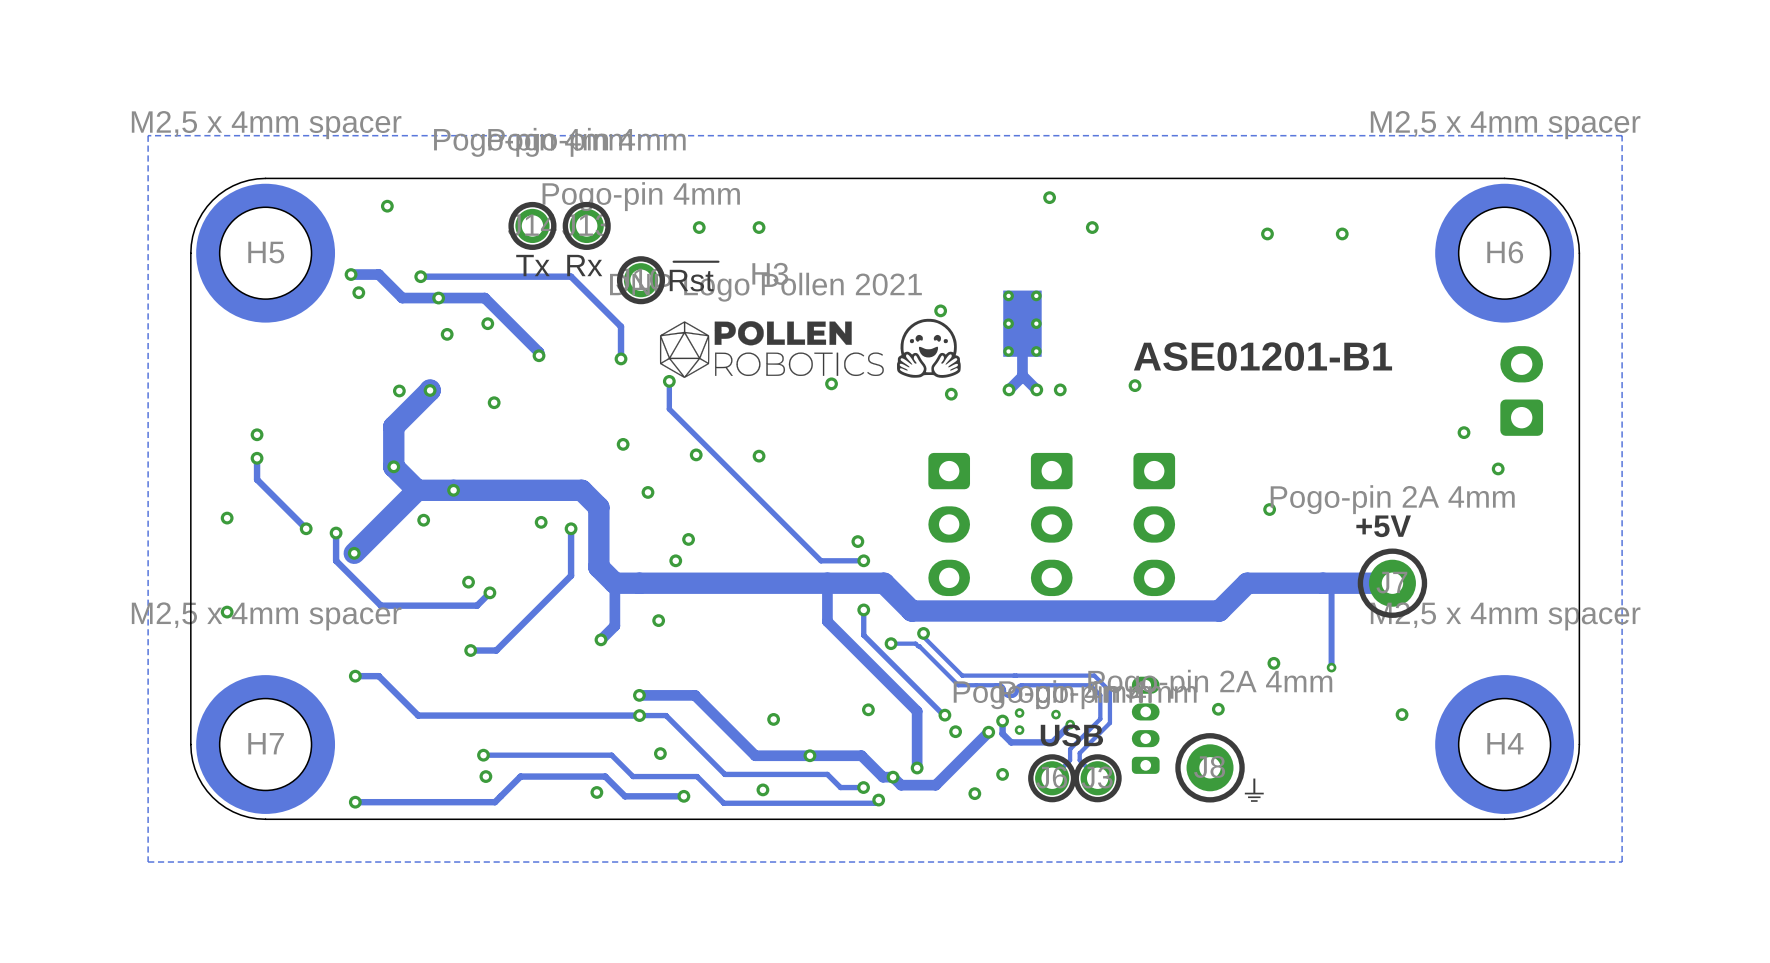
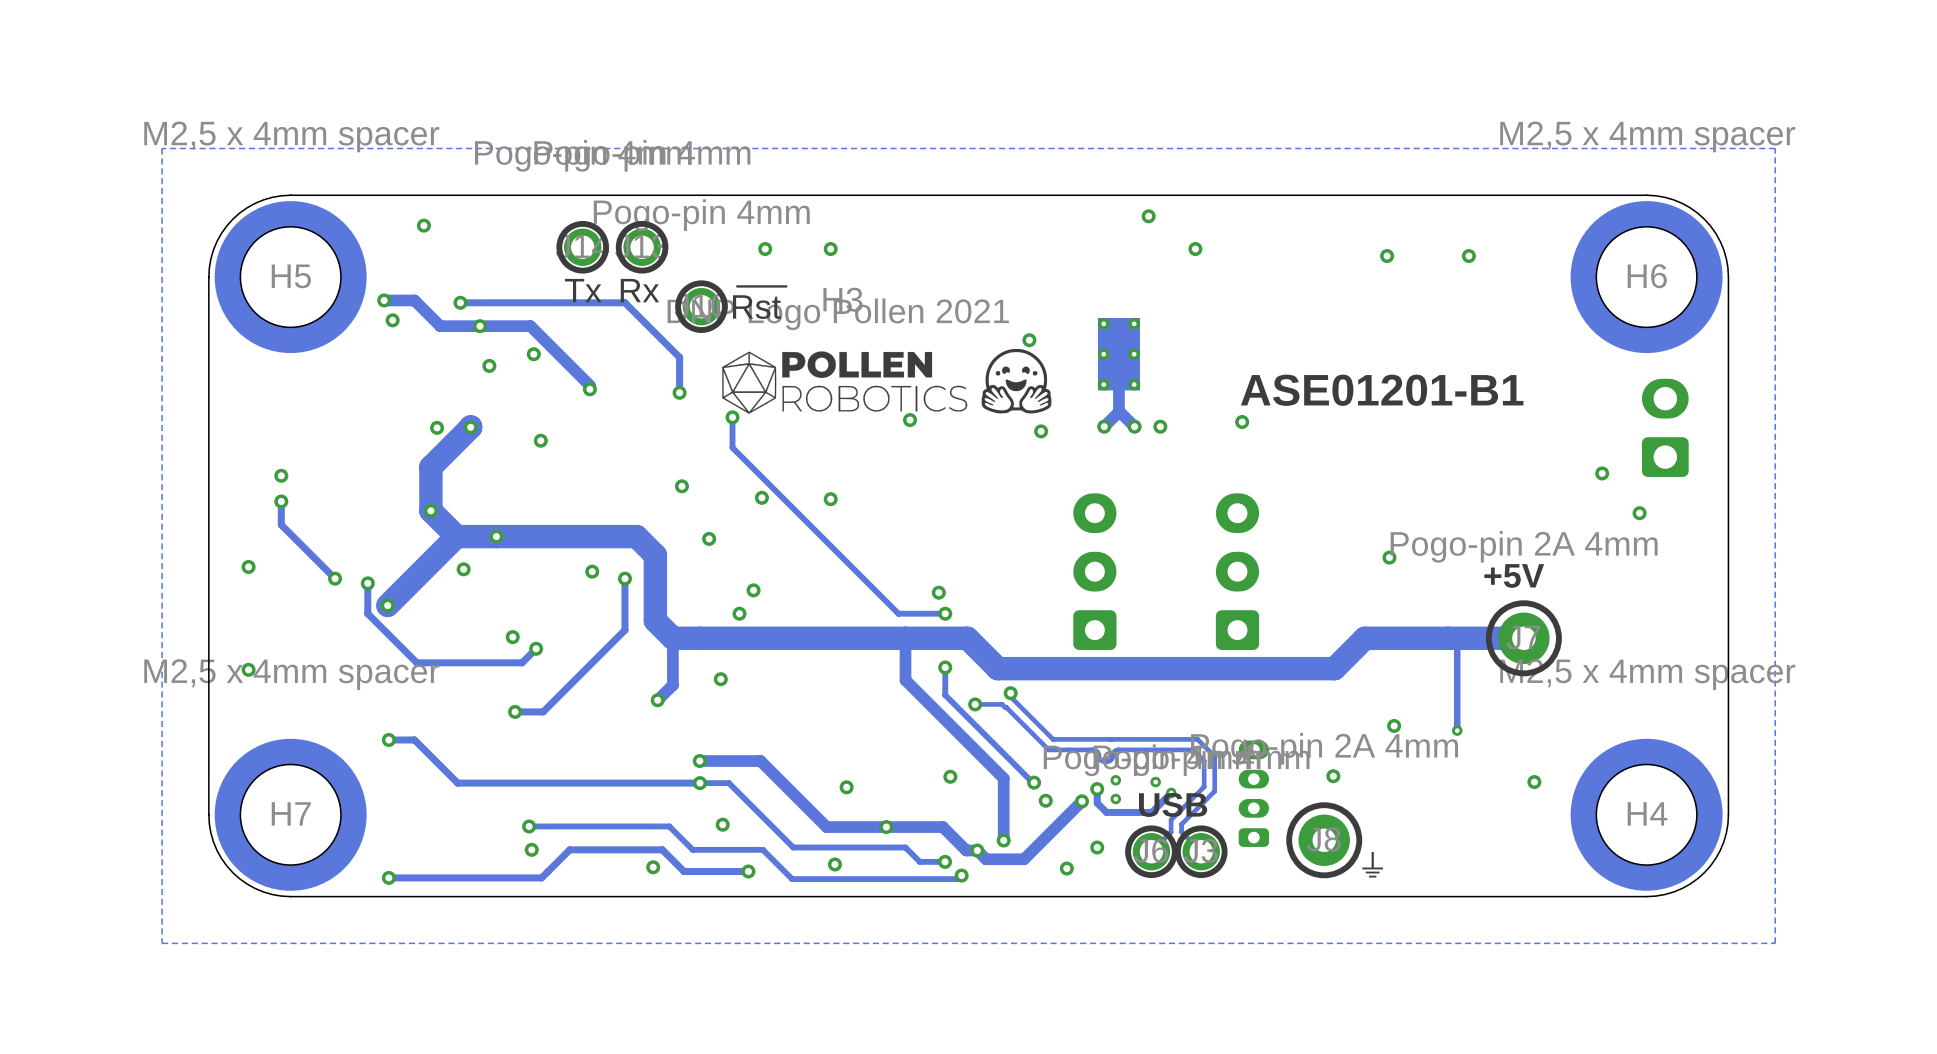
part: none -> (1094, 571)
part: none -> (1237, 571)
part: (949, 524) -> none
part: (1051, 524) -> none
part: (1154, 524) -> none

